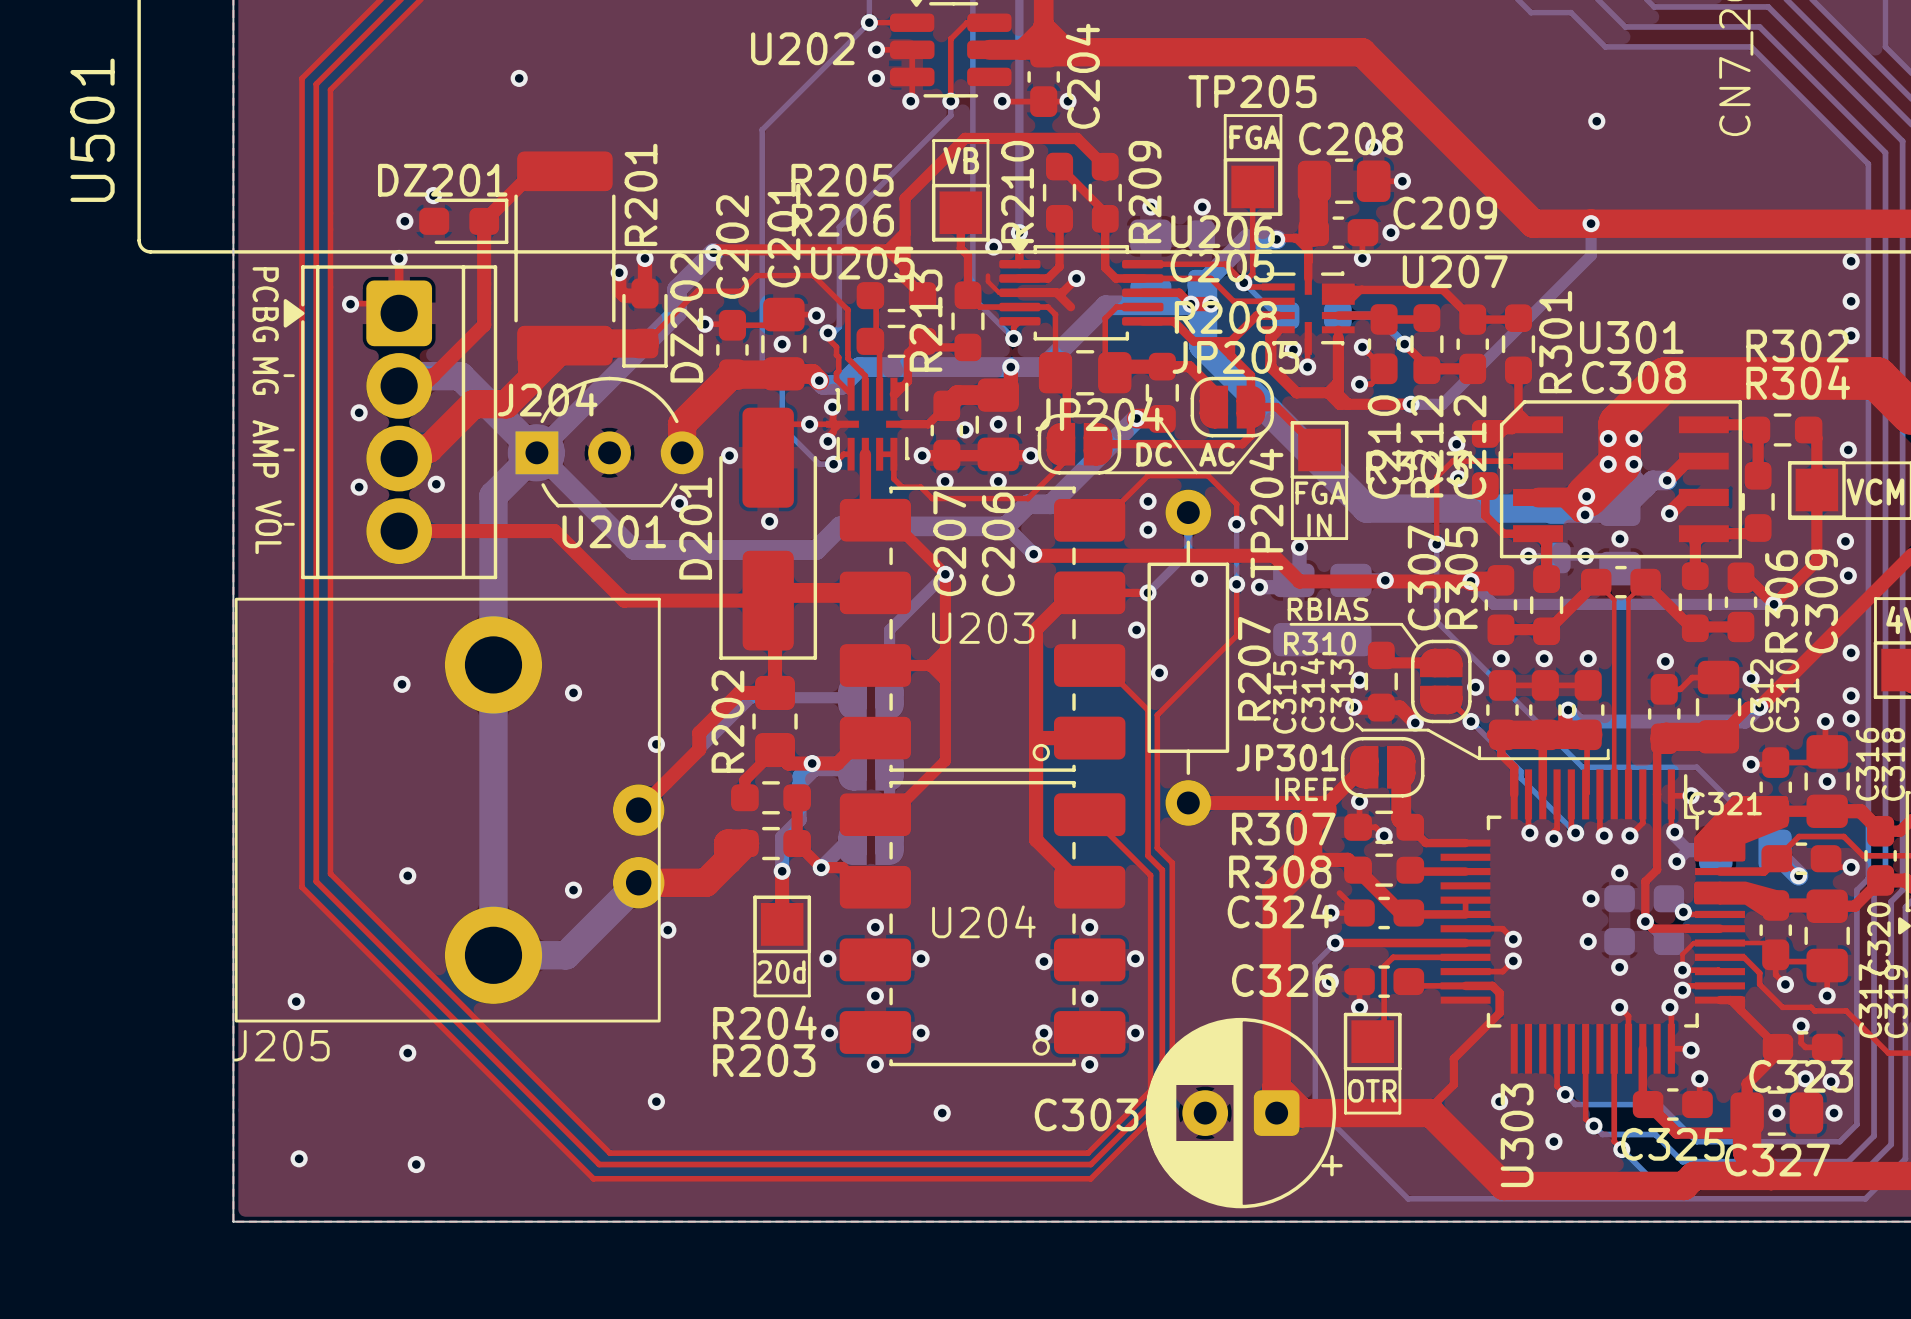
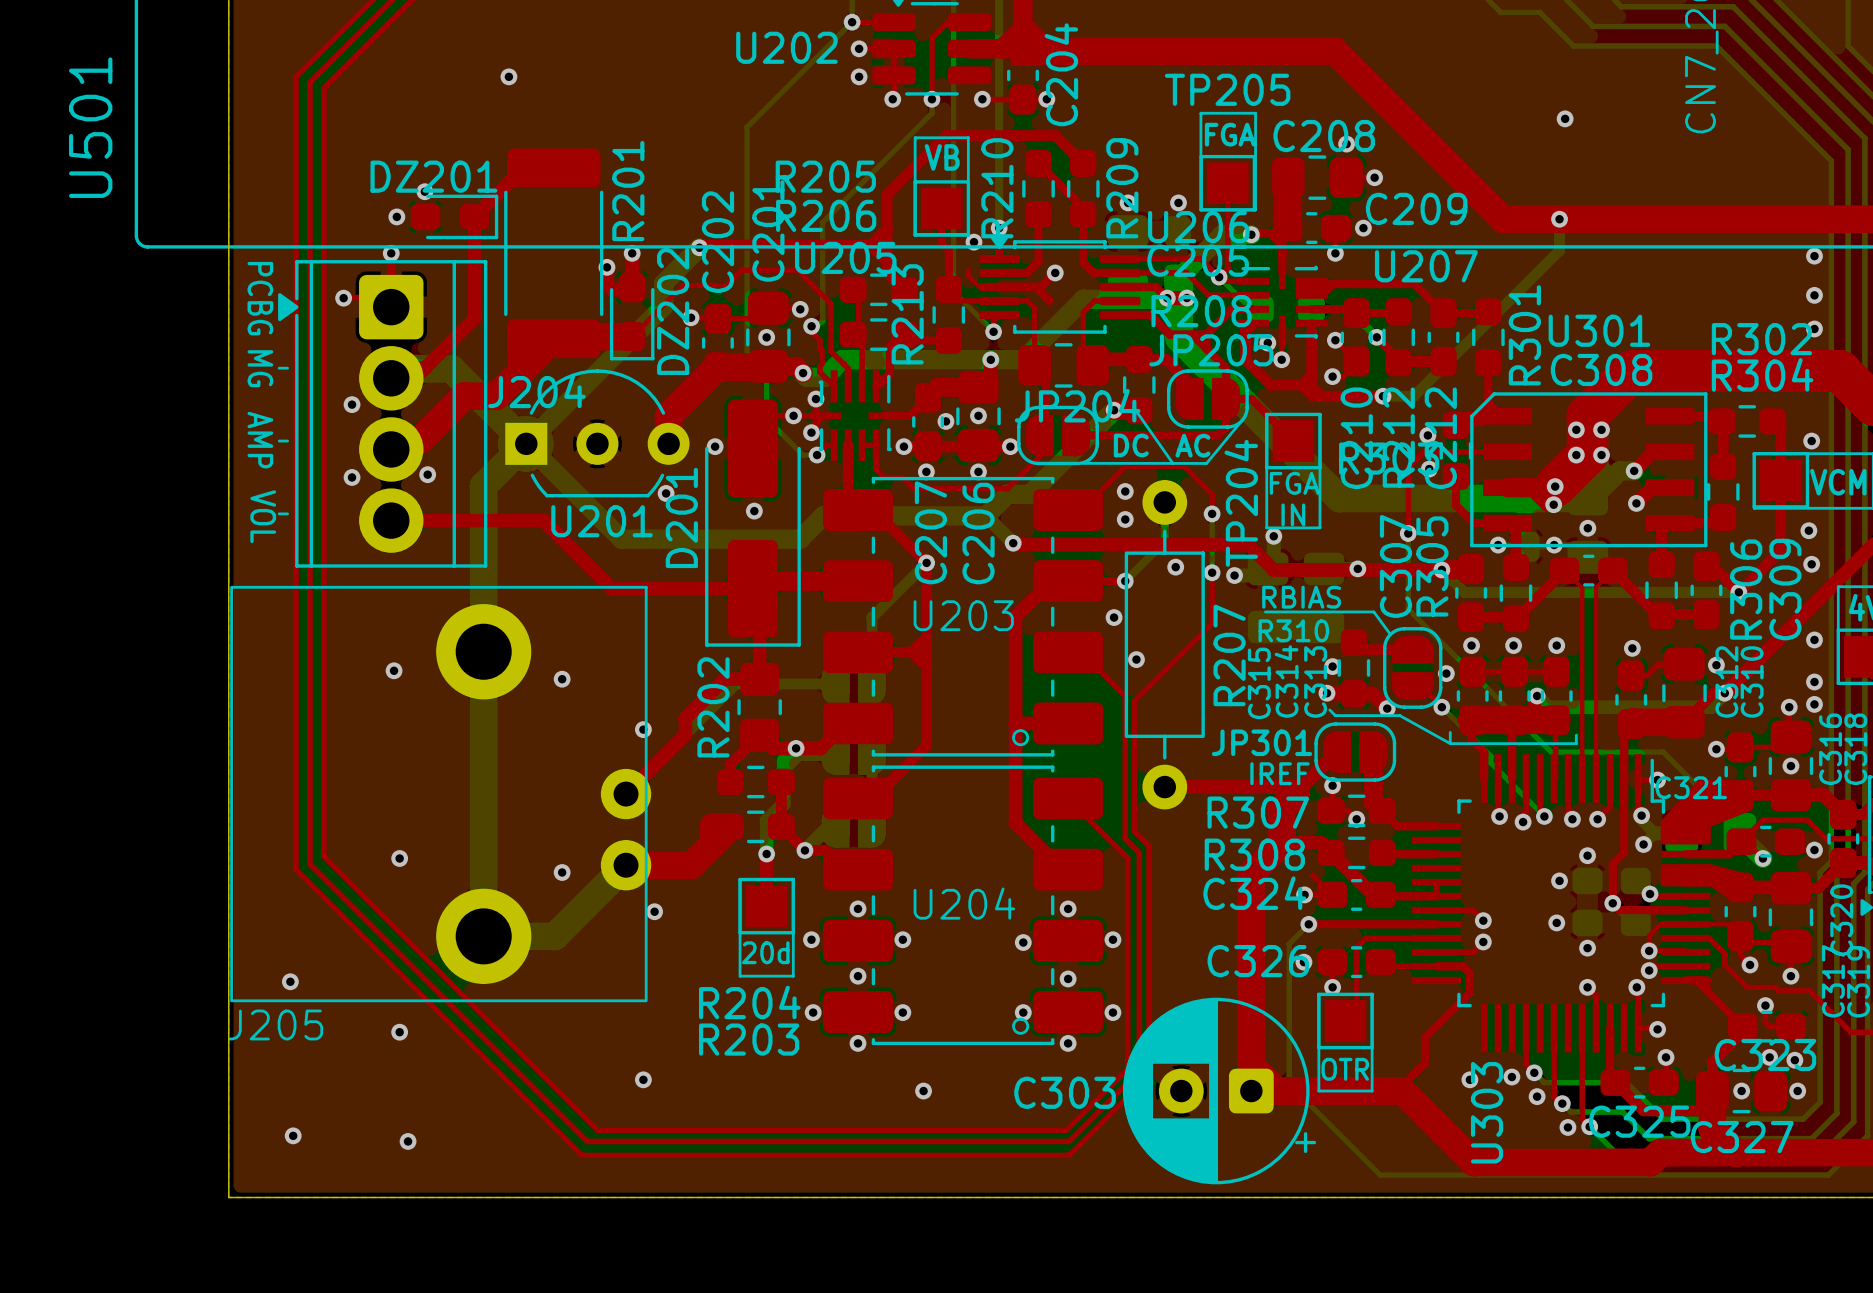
via: none -> (1511, 1077)
via: none -> (1537, 1096)
via: (1553, 1141) -> none
via: none -> (1567, 1127)

